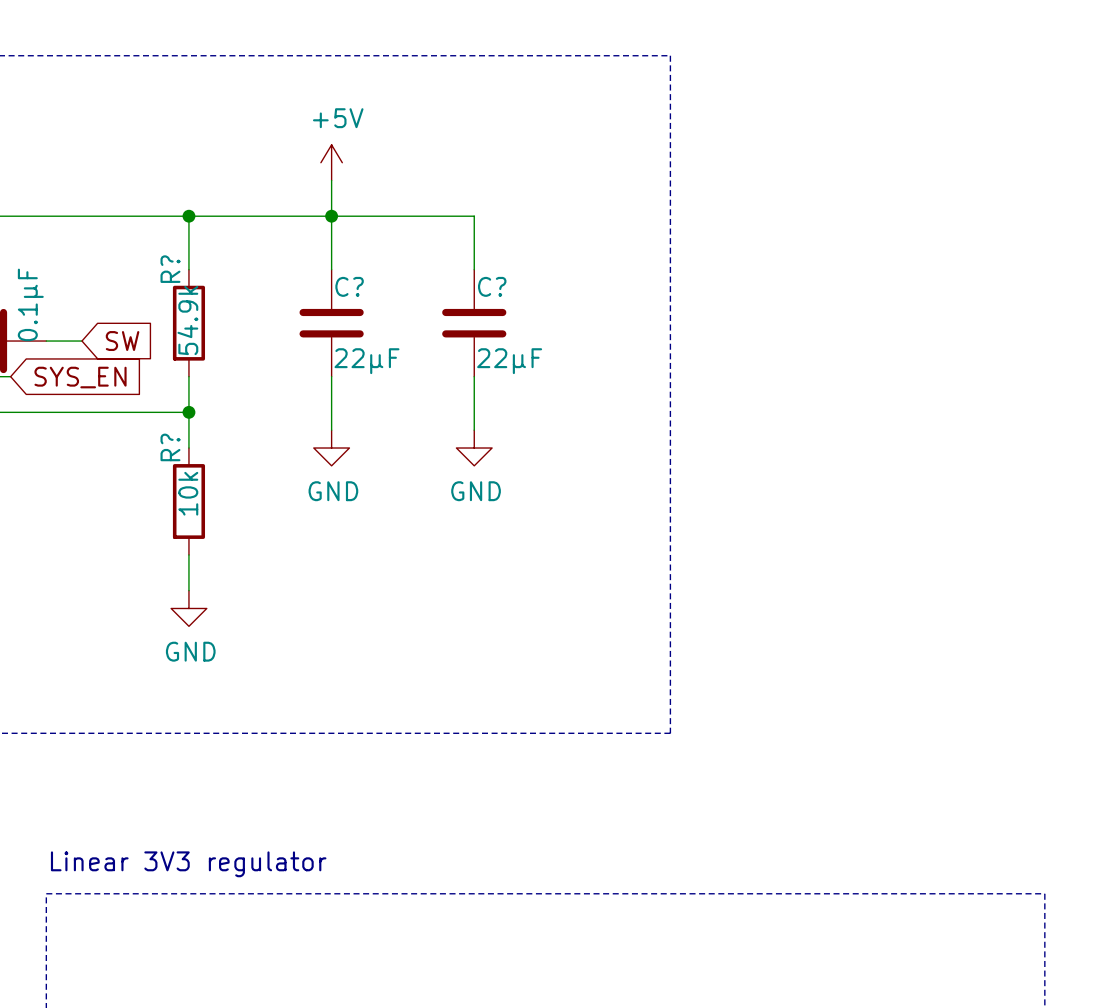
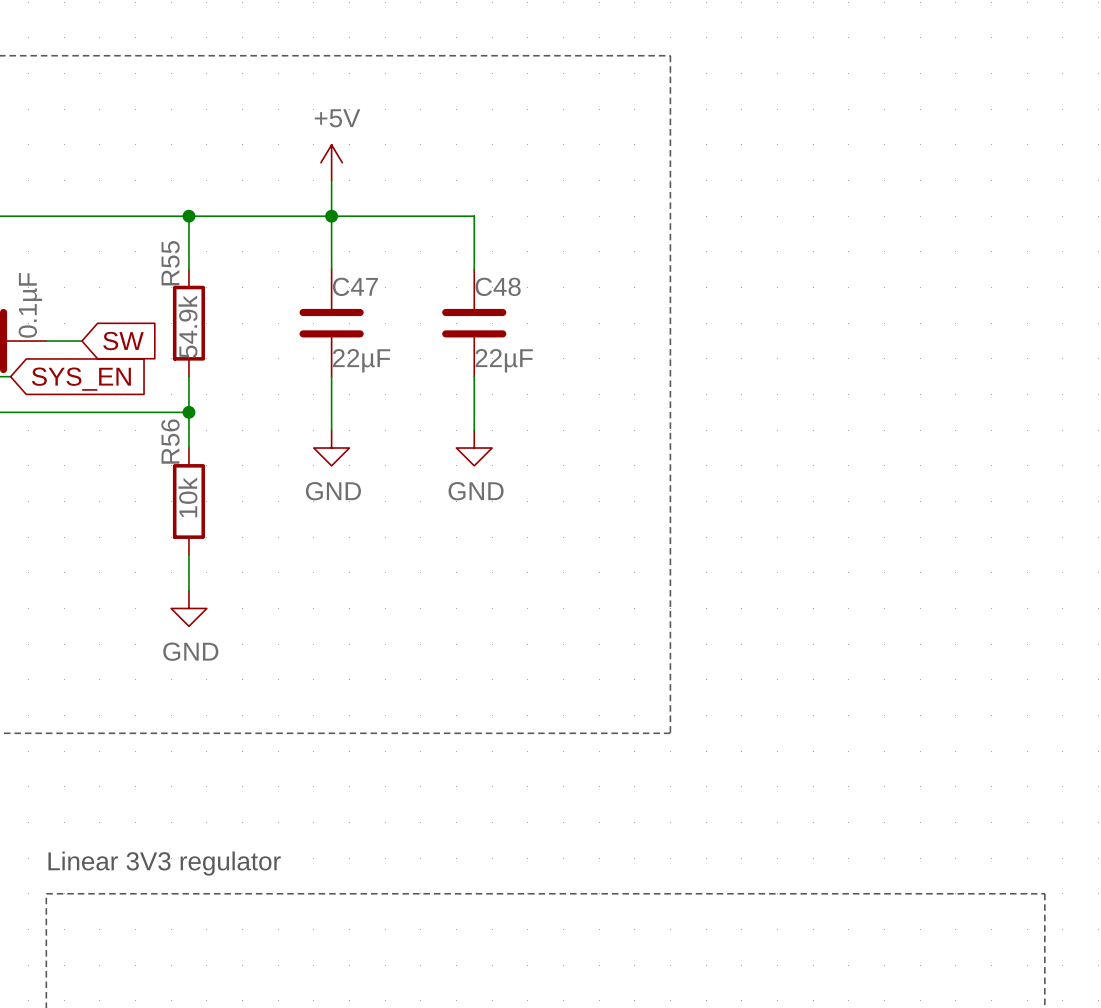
R? name: R? (170, 269) -> R55 (170, 263)
C? name: C? (349, 286) -> C47 (355, 286)
C? name: C? (492, 286) -> C48 (498, 286)
R? name: R? (170, 447) -> R56 (170, 441)

